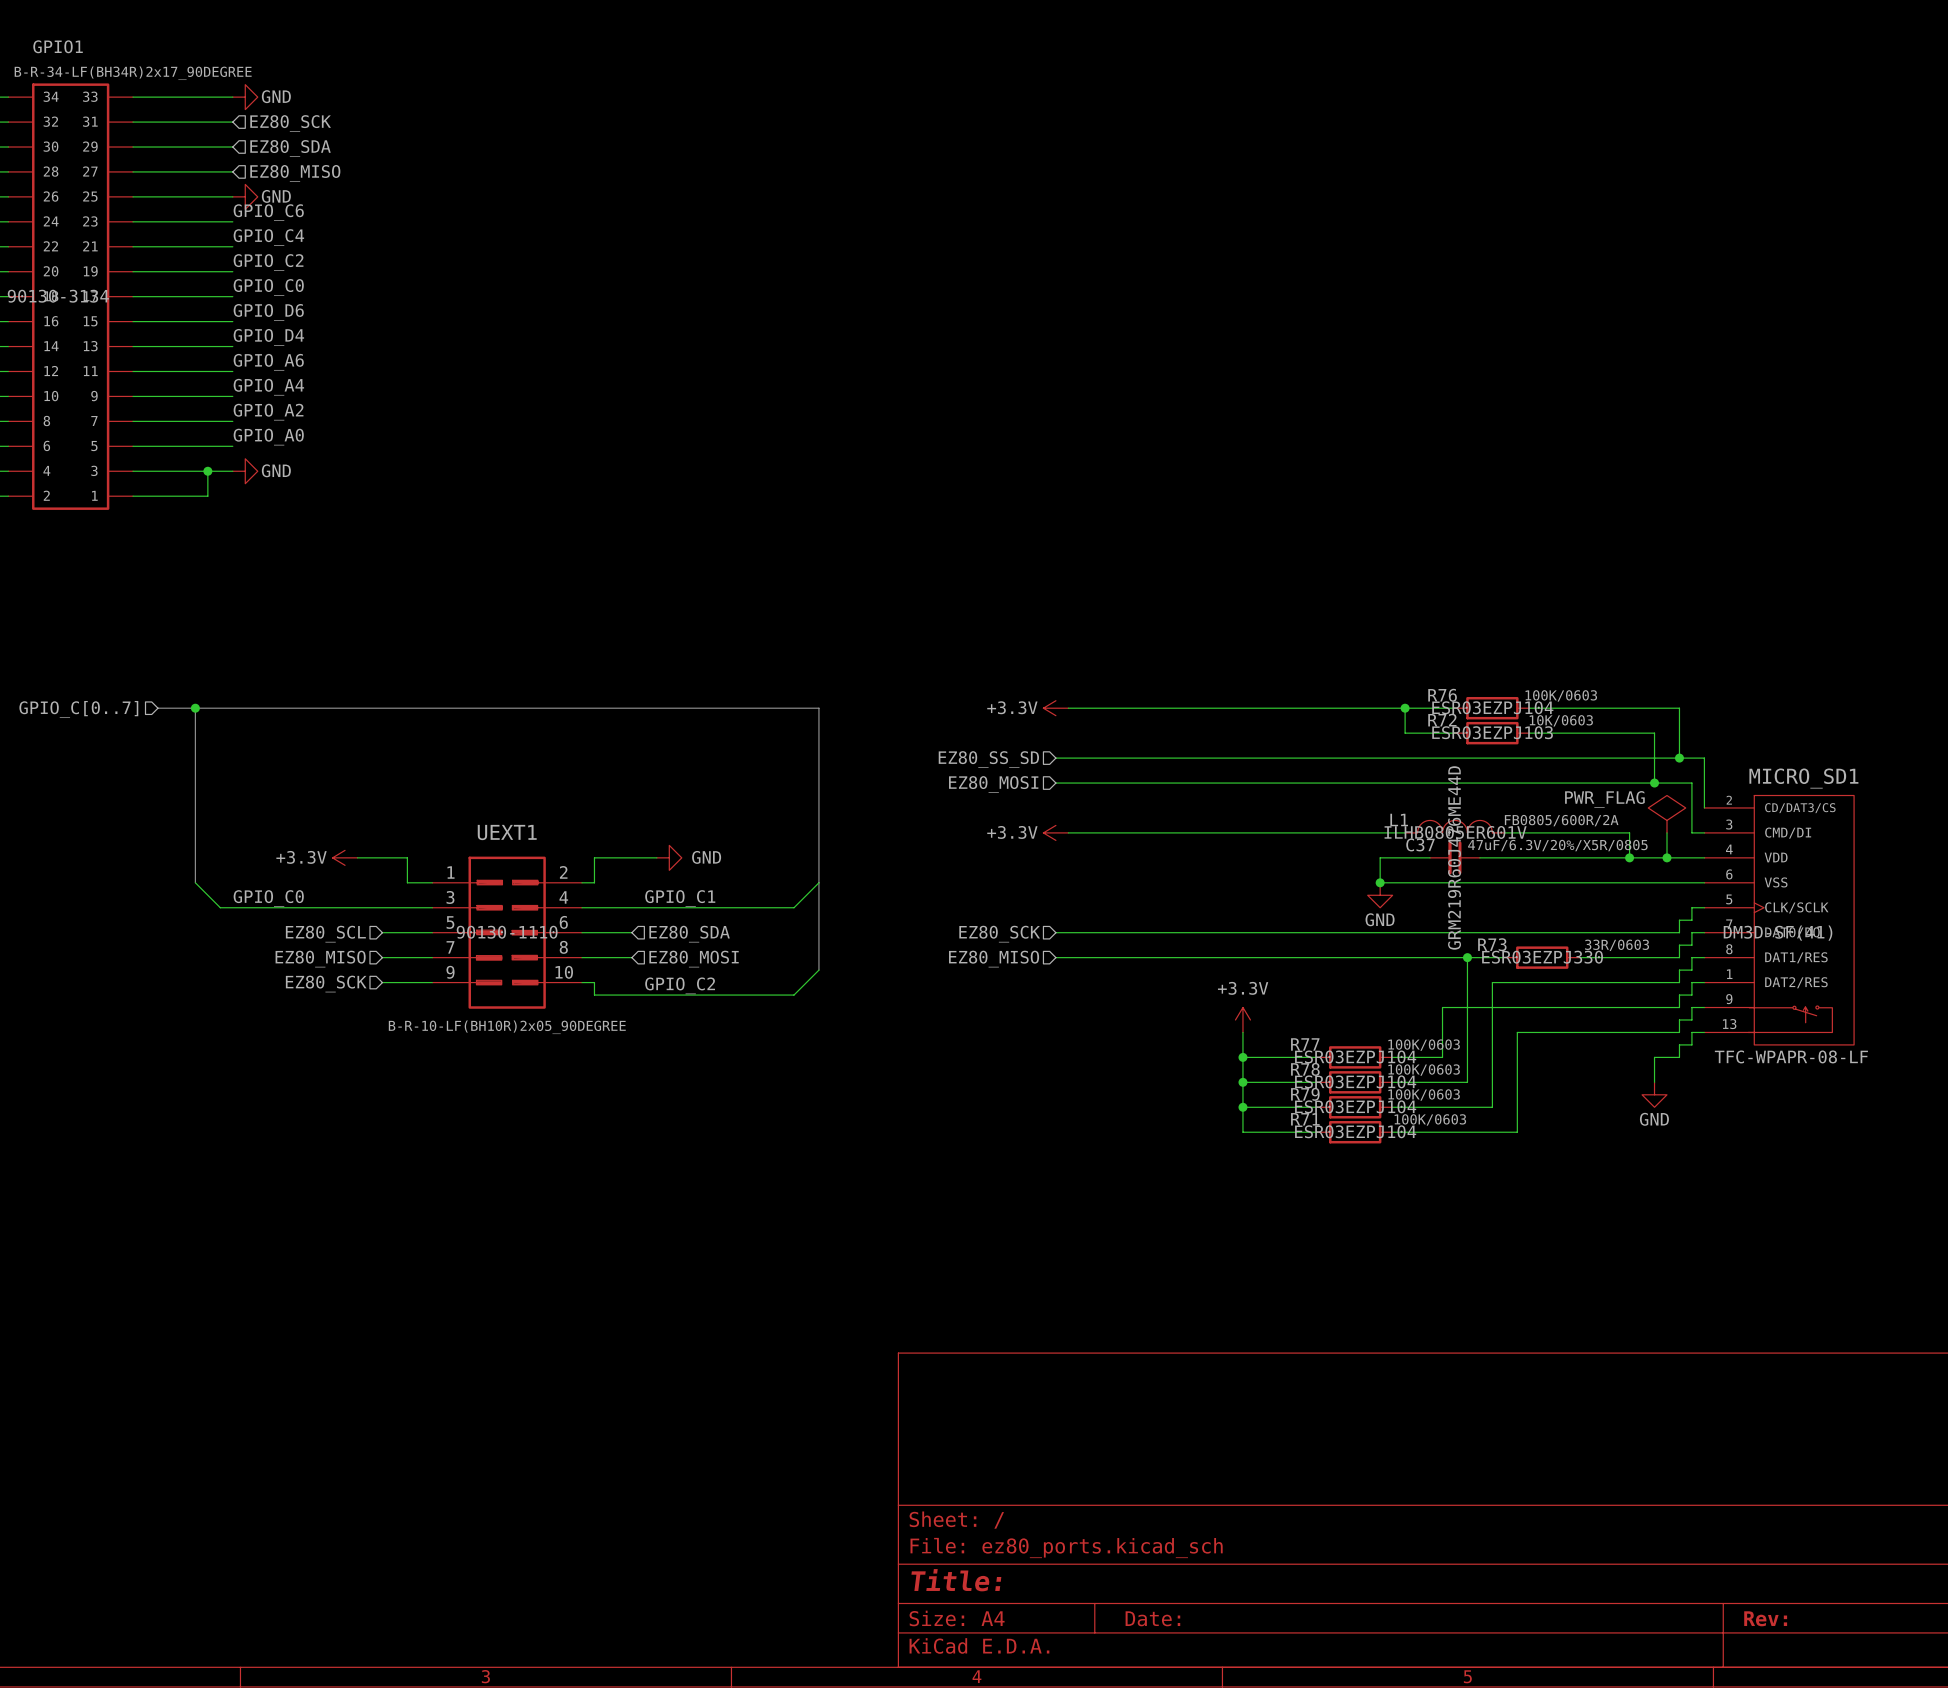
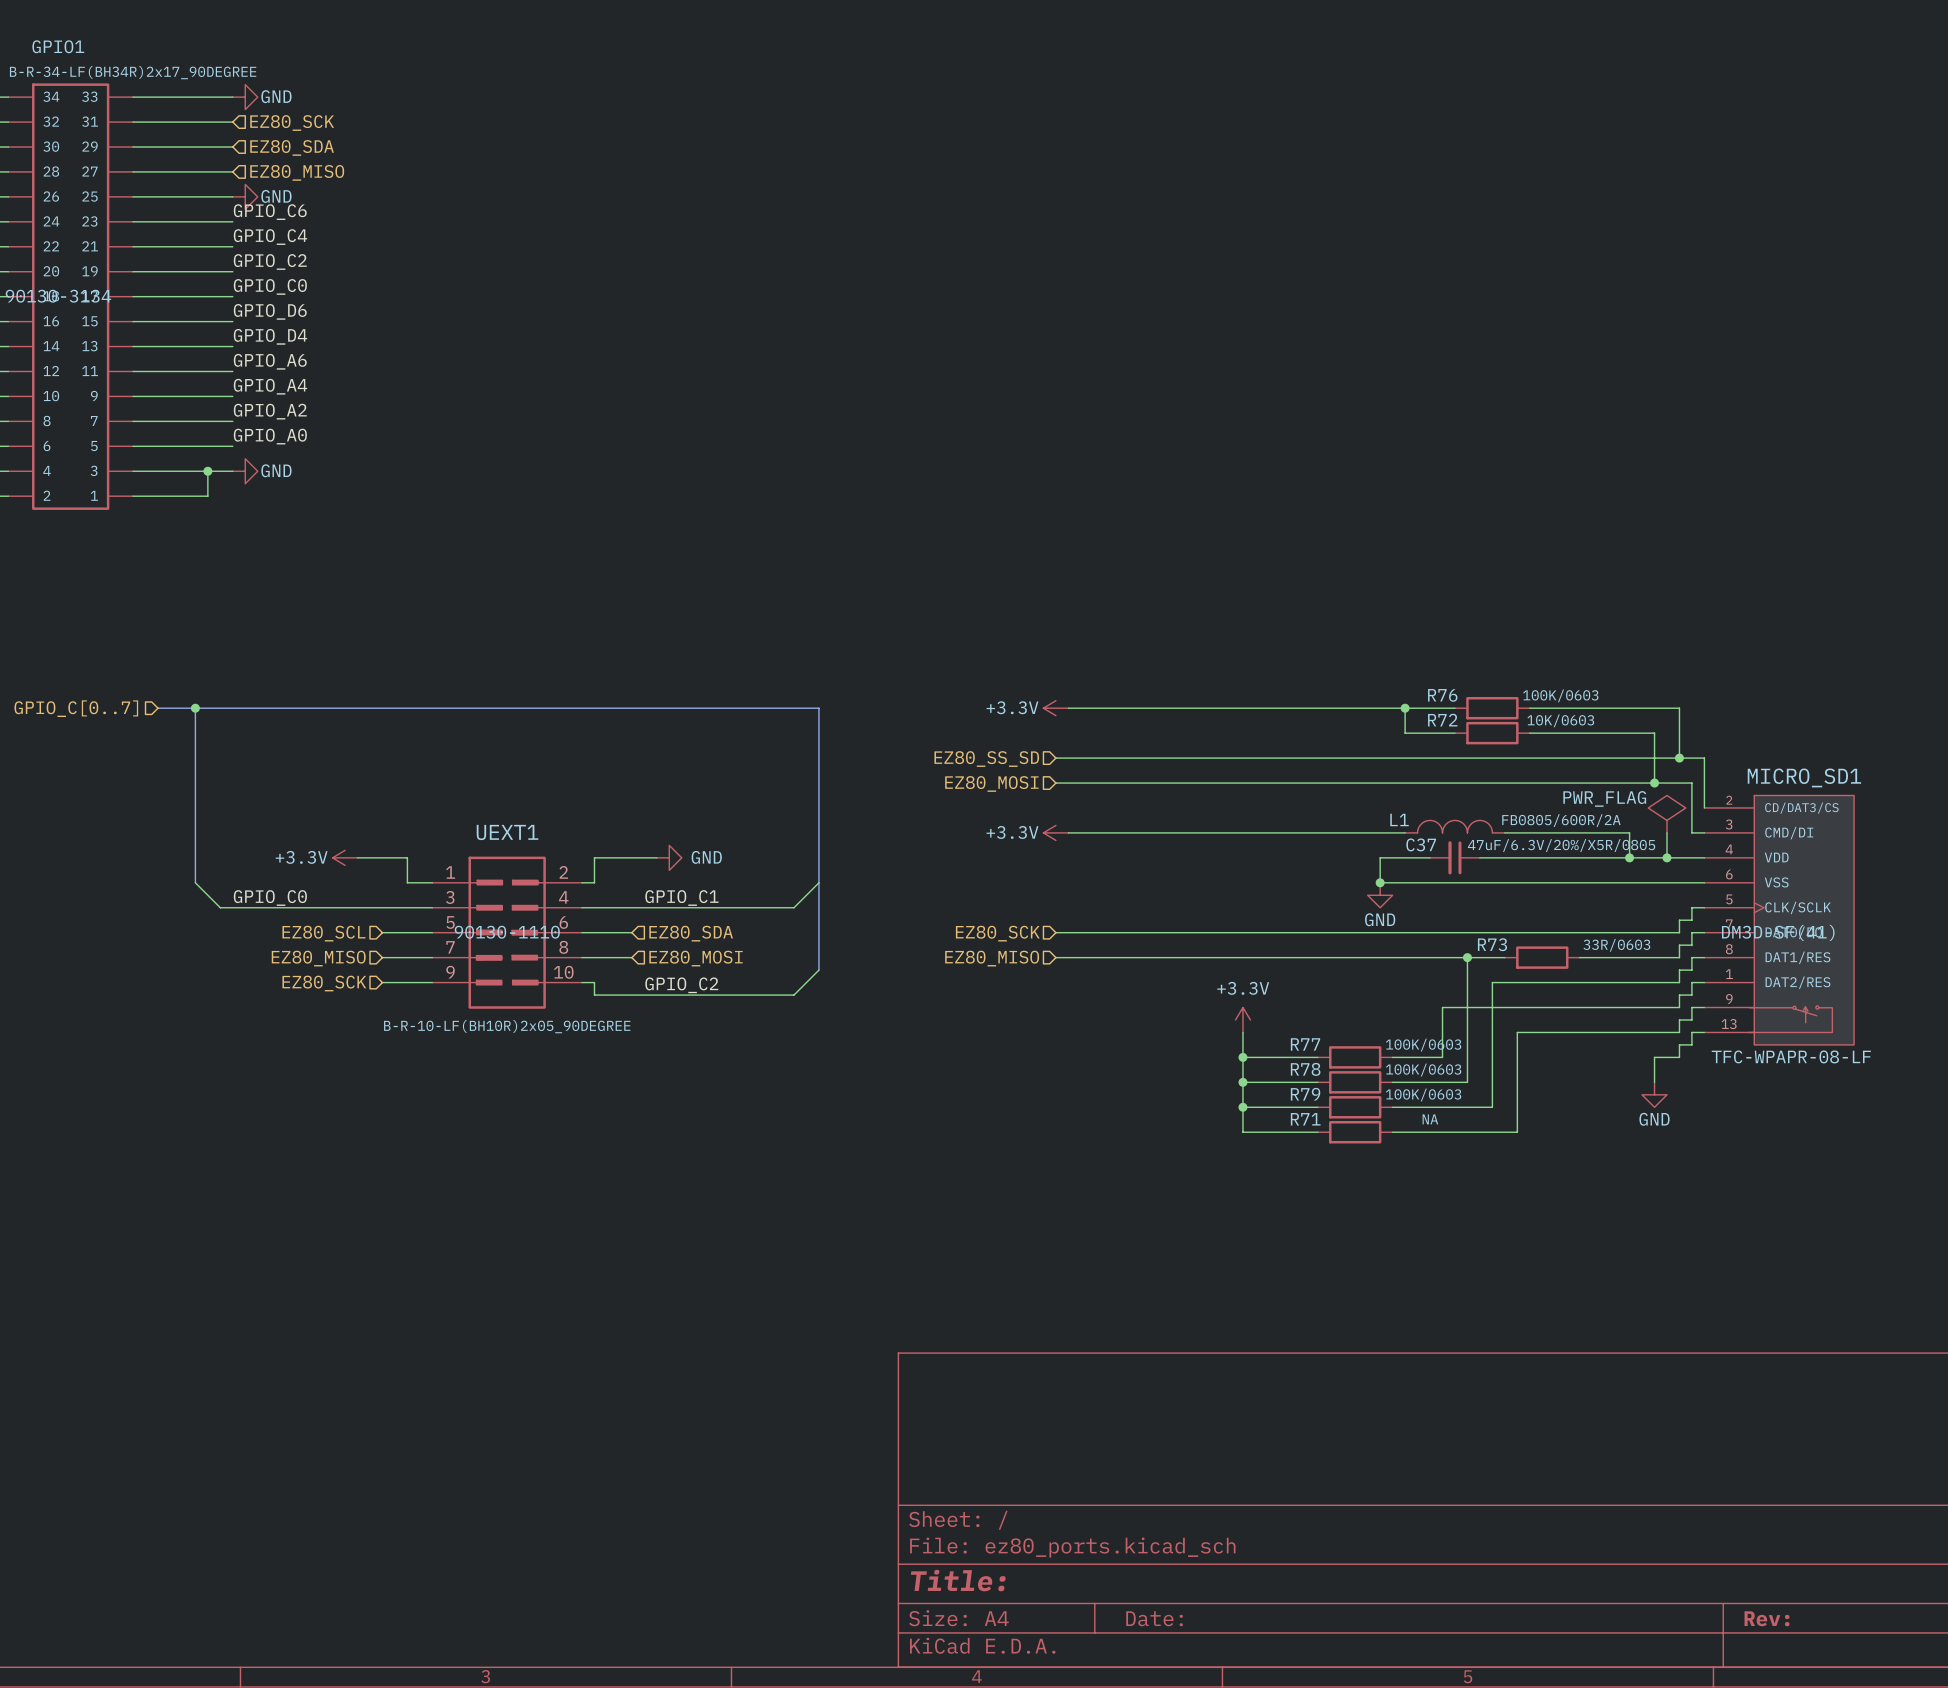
R76 text: ESR03EZPJ104 (1492, 707) -> none
R72 text: ESR03EZPJ103 (1492, 732) -> none
L1 text: ILHB0805ER601V (1455, 832) -> none
C37 text: GRM219R60J476ME44D (1454, 857) -> none
R73 text: ESR03EZPJ330 (1542, 957) -> none
R77 text: ESR03EZPJ104 (1355, 1056) -> none
R78 text: ESR03EZPJ104 (1355, 1081) -> none
R79 text: ESR03EZPJ104 (1355, 1106) -> none
R71 value: 100K/0603 (1430, 1119) -> NA (1430, 1119)
R71 text: ESR03EZPJ104 (1355, 1131) -> none

